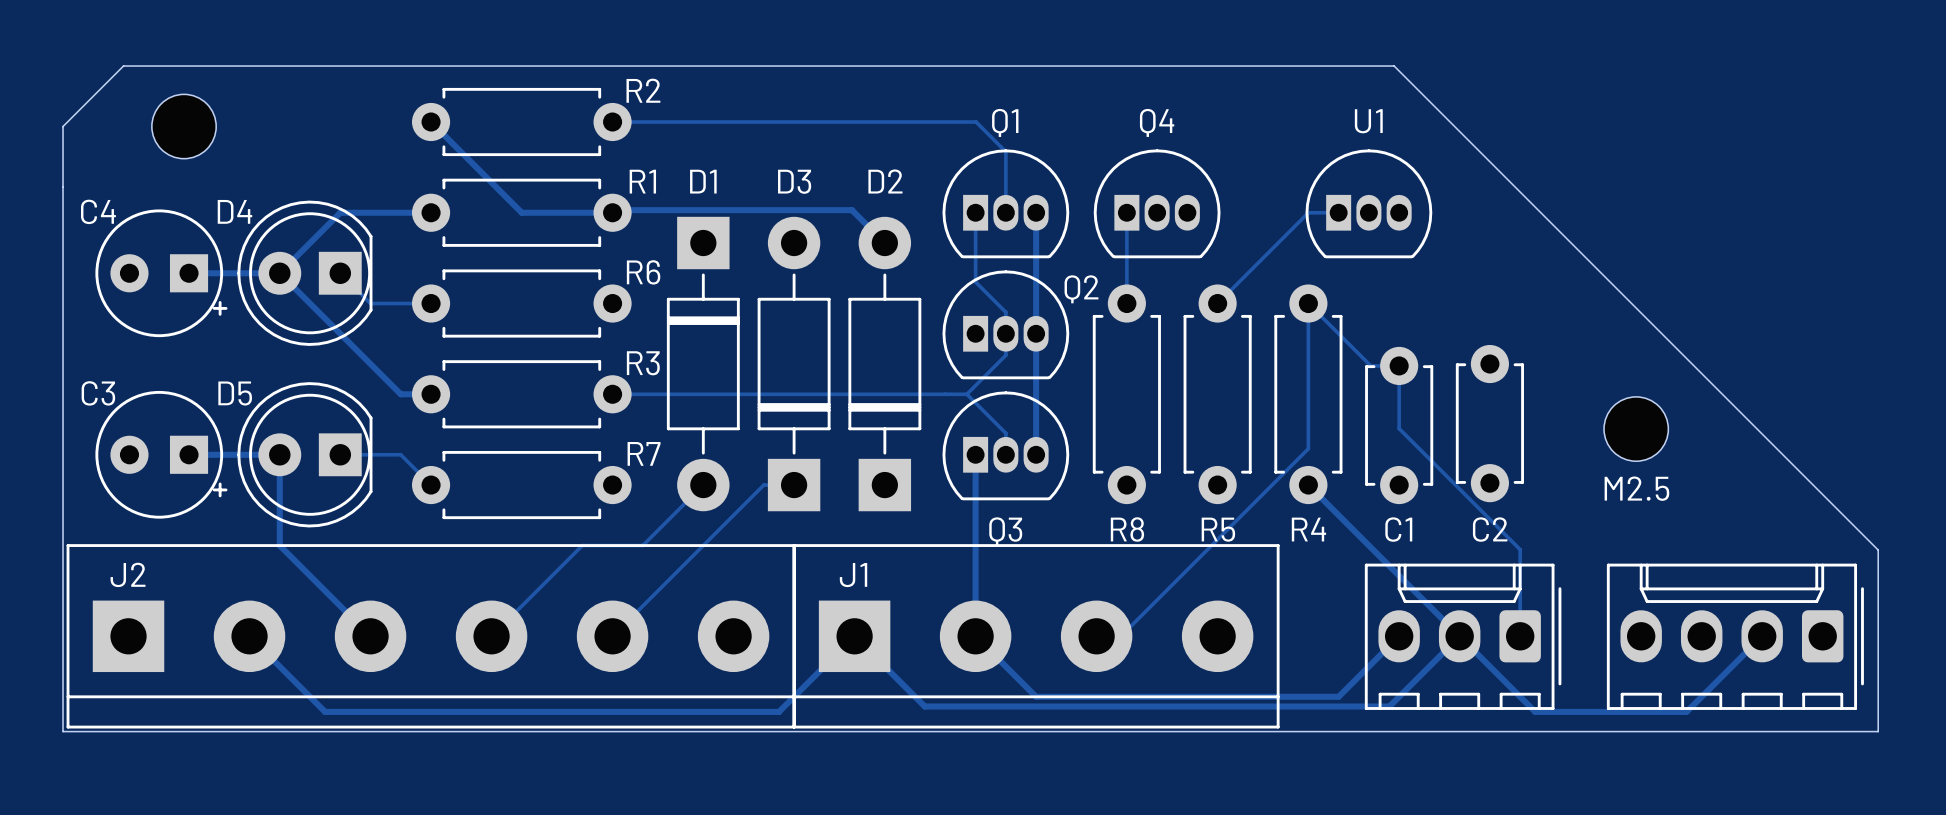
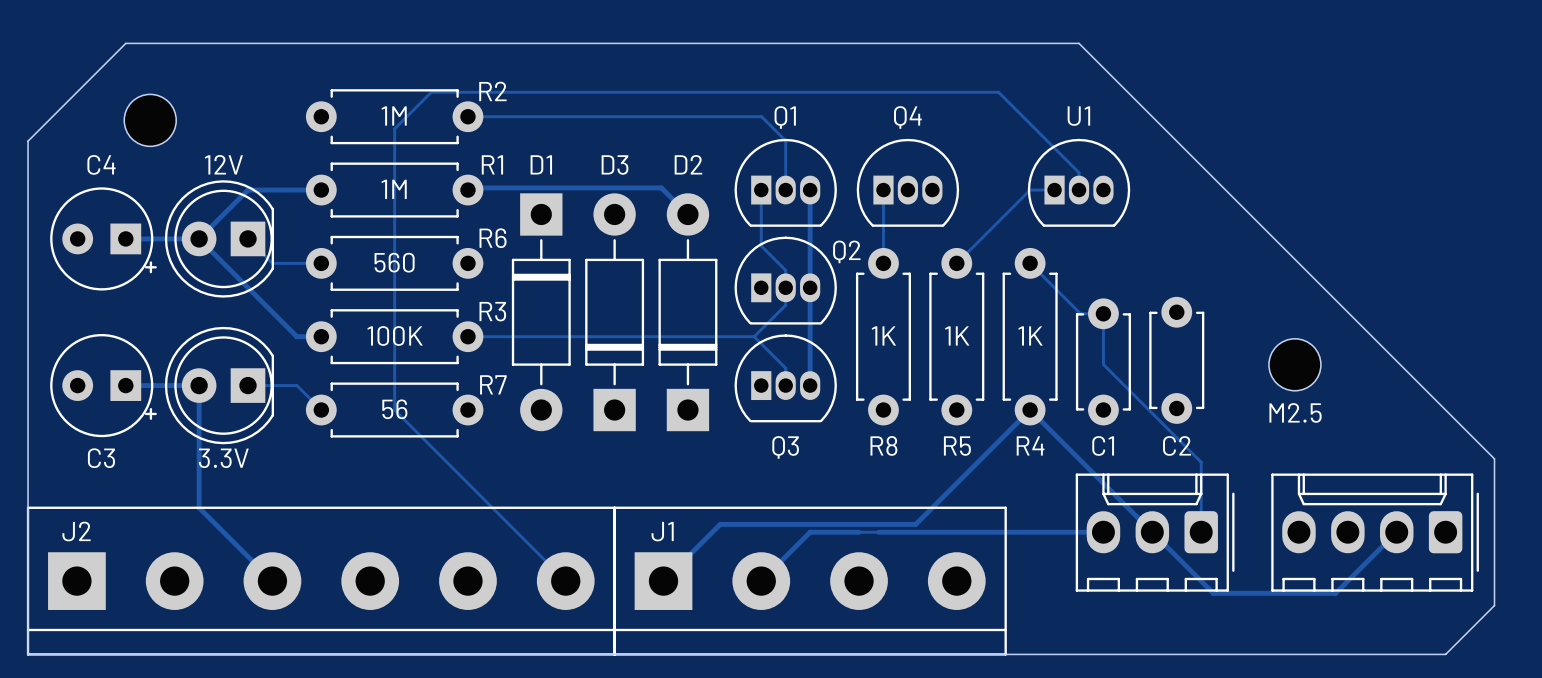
board edge: (123, 66) (1394, 66) (1878, 550) (1878, 731) (63, 731) (63, 126) (123, 66) -> (125, 43) (28, 141) (28, 654) (1445, 654) (1494, 605) (1494, 458) (1079, 43) (125, 43)
text: none -> 1M (394, 116)
track: (431, 122) (521, 212) (612, 212) -> none
part position: (184, 126) -> (150, 120)
text: none -> 12V (223, 164)
C4 name position: C4 (98, 211) -> C4 (101, 164)
D4 name: D4 (234, 211) -> none
text: none -> 1M (394, 189)
track: none -> (1079, 190) (1079, 172) (998, 92) (431, 92) (394, 128) (394, 410) (565, 581)
text: none -> 560 (394, 262)
track: (1308, 303) (1308, 448) (1120, 636) -> none
C3 name position: C3 (98, 393) -> C3 (101, 458)
D5 name: D5 (235, 393) -> none
text: none -> 100K (395, 335)
text: none -> 1K (883, 335)
text: none -> 1K (957, 335)
text: none -> 1K (1030, 335)
track: (975, 454) (975, 636) (1036, 696) (1338, 696) (1399, 636) -> (878, 532) (1103, 532)
text: none -> 56 (394, 409)
track: (703, 485) (642, 545) (582, 545) (491, 636) -> none
track: (794, 485) (763, 485) (612, 636) -> none
track: none -> (1030, 410) (915, 524) (720, 524) (663, 581)
text: none -> 3.3V (223, 458)
track: (279, 545) (370, 636) -> (199, 458) (199, 507) (272, 581)
track: (249, 636) (325, 711) (778, 711) (854, 636) (924, 706) (1389, 706) (1459, 636) -> none
J2 position: (431, 636) -> (321, 581)
J1 position: (1036, 636) -> (810, 581)
track: none -> (859, 532) (810, 532) (761, 581)

